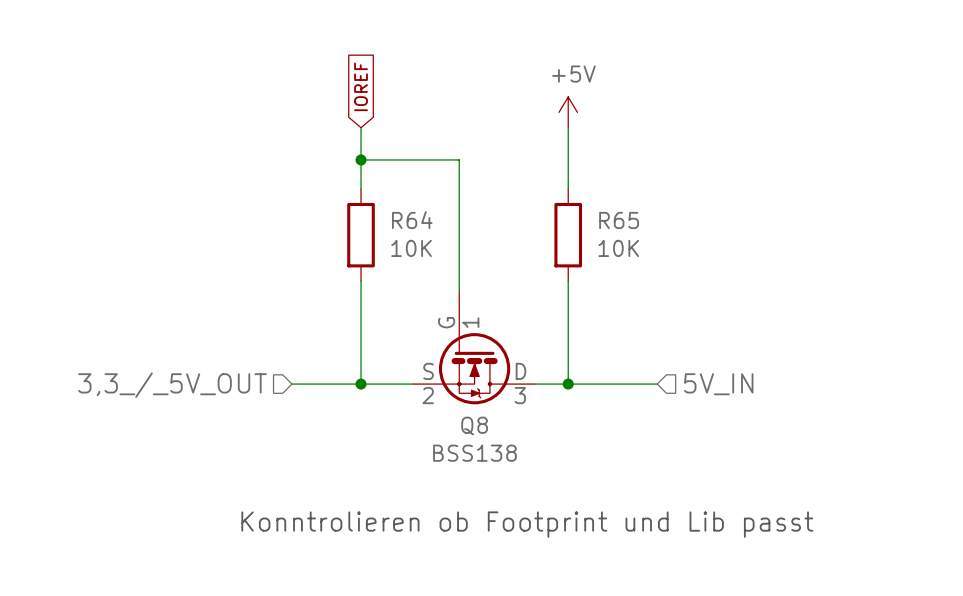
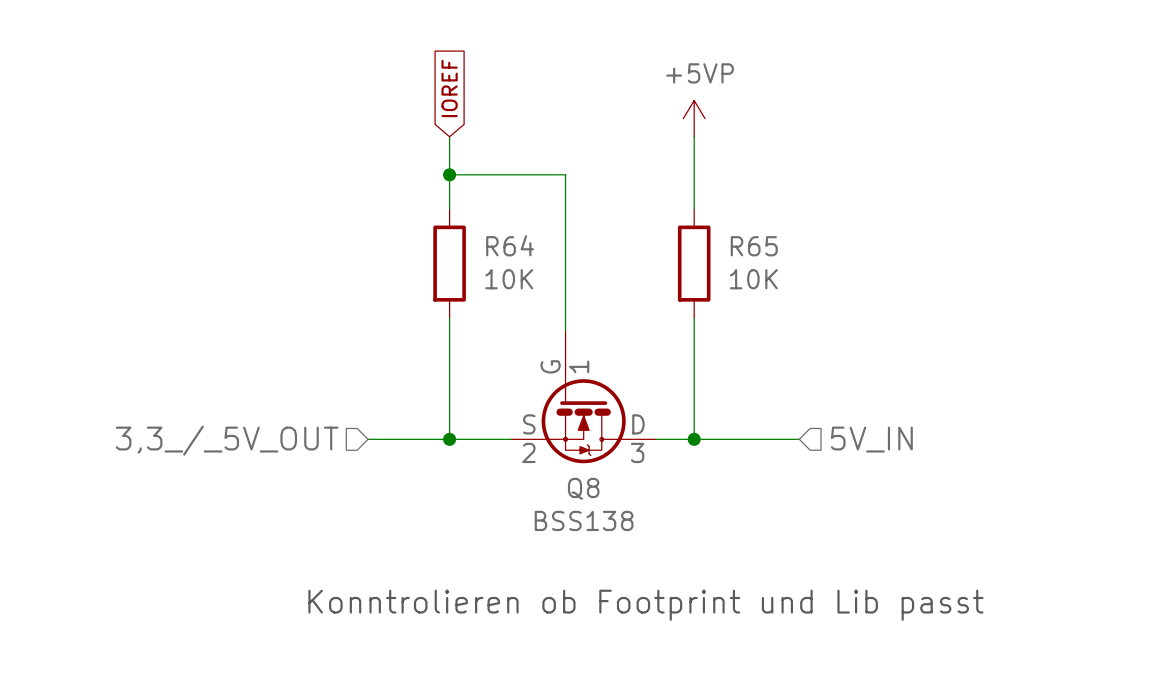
power symbol: +5V (568, 112) -> +5VP (694, 118)

